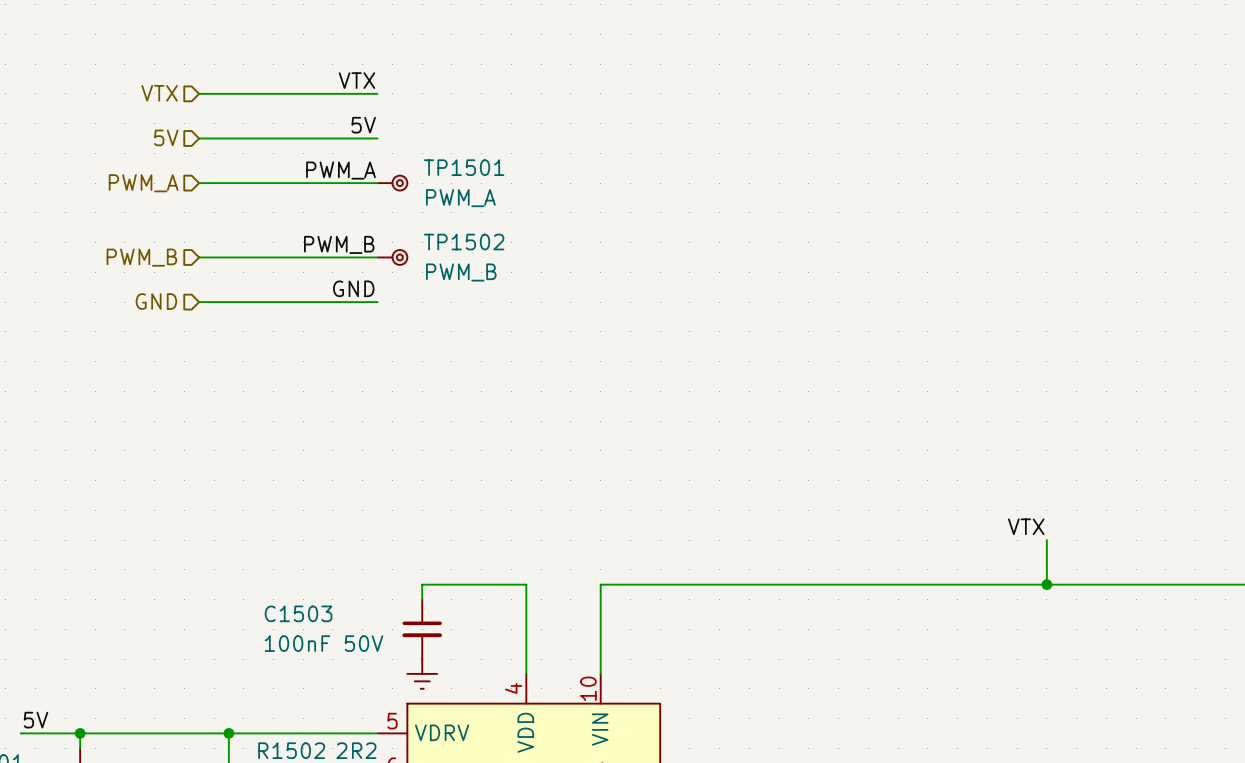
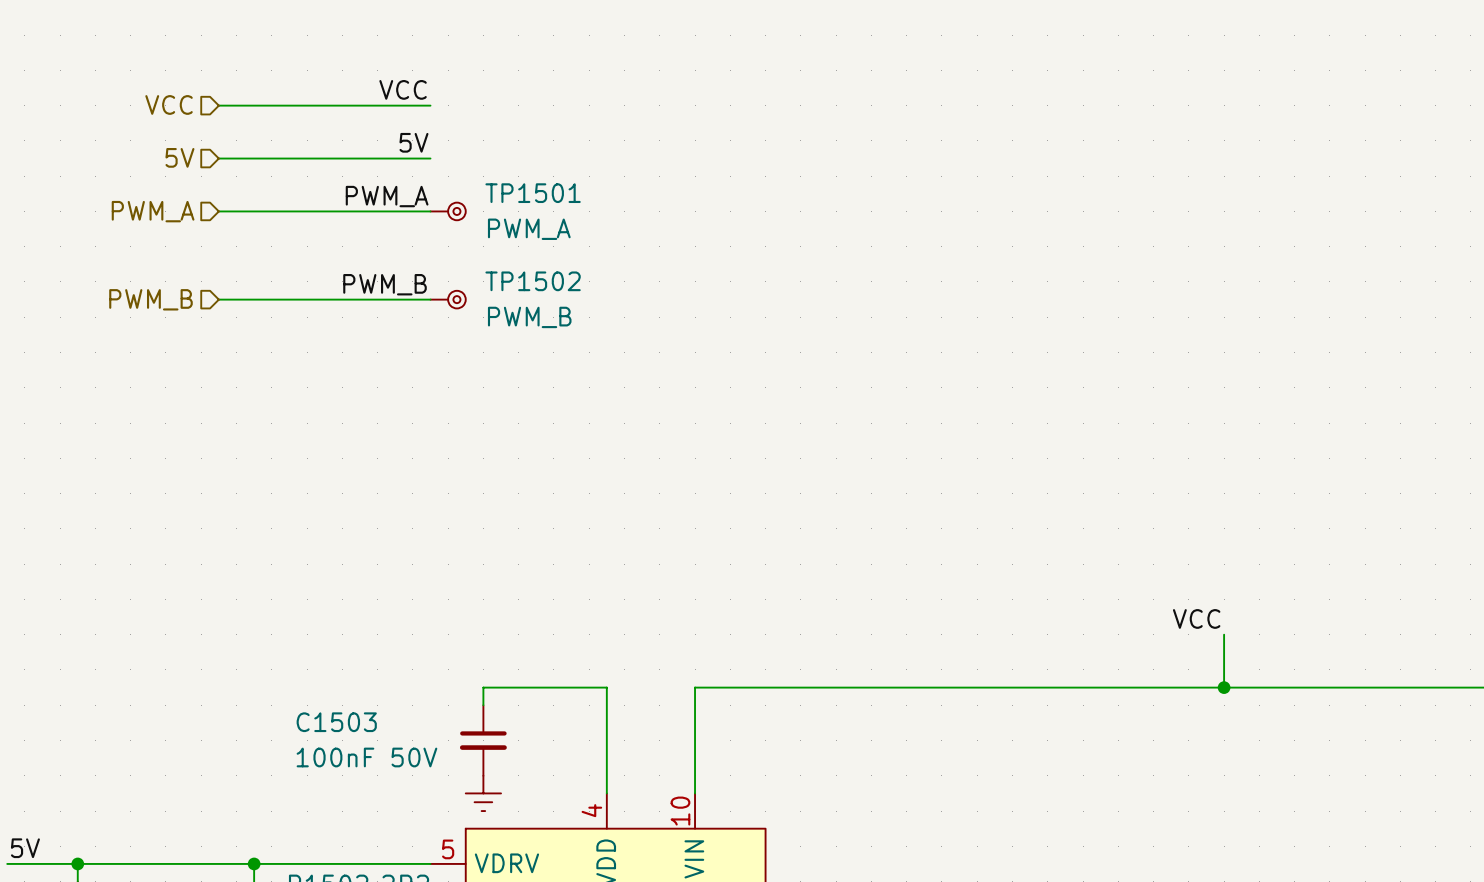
label: VTX (356, 80) -> VCC (403, 89)
hierarchical label: VTX (159, 93) -> VCC (169, 104)
label: GND (353, 288) -> none
hierarchical label: GND (156, 301) -> none
wire: (199, 302) (377, 302) -> none
label: VTX (1026, 526) -> VCC (1196, 618)

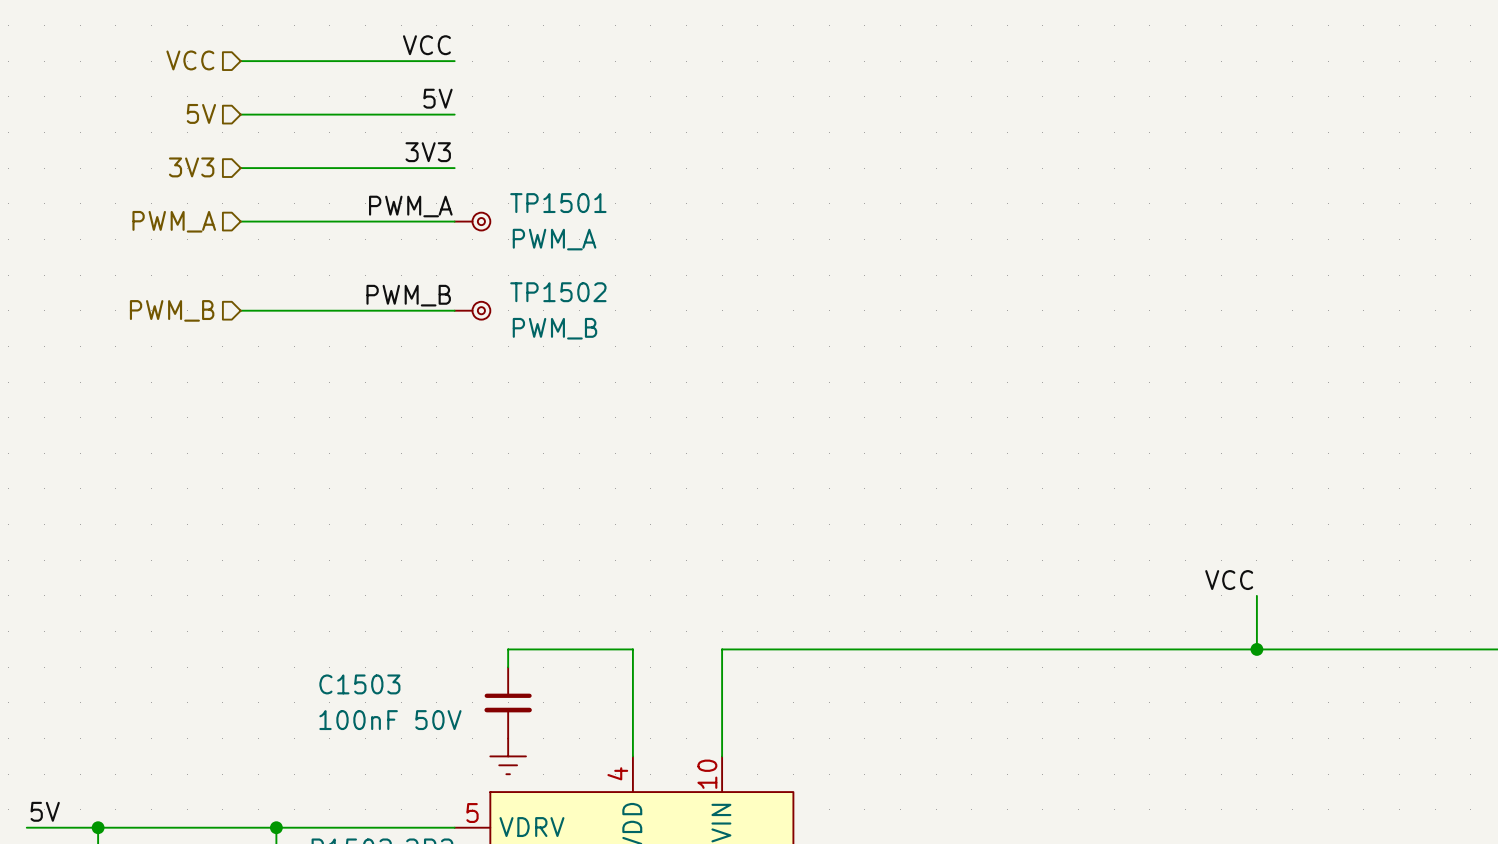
label: PWM_A (387, 196) -> 3V3 (428, 152)
hierarchical label: PWM_A (153, 211) -> 3V3 (191, 167)
TP1501 position: (448, 211) -> (472, 221)
label: none -> PWM_A (410, 206)
hierarchical label: none -> PWM_A (174, 221)
label position: PWM_B (385, 284) -> PWM_B (408, 295)
hierarchical label position: PWM_B (150, 299) -> PWM_B (172, 310)
wire: (218, 299) (430, 299) -> (240, 221) (454, 221)
TP1502 position: (448, 299) -> (472, 310)
wire: none -> (240, 310) (454, 310)

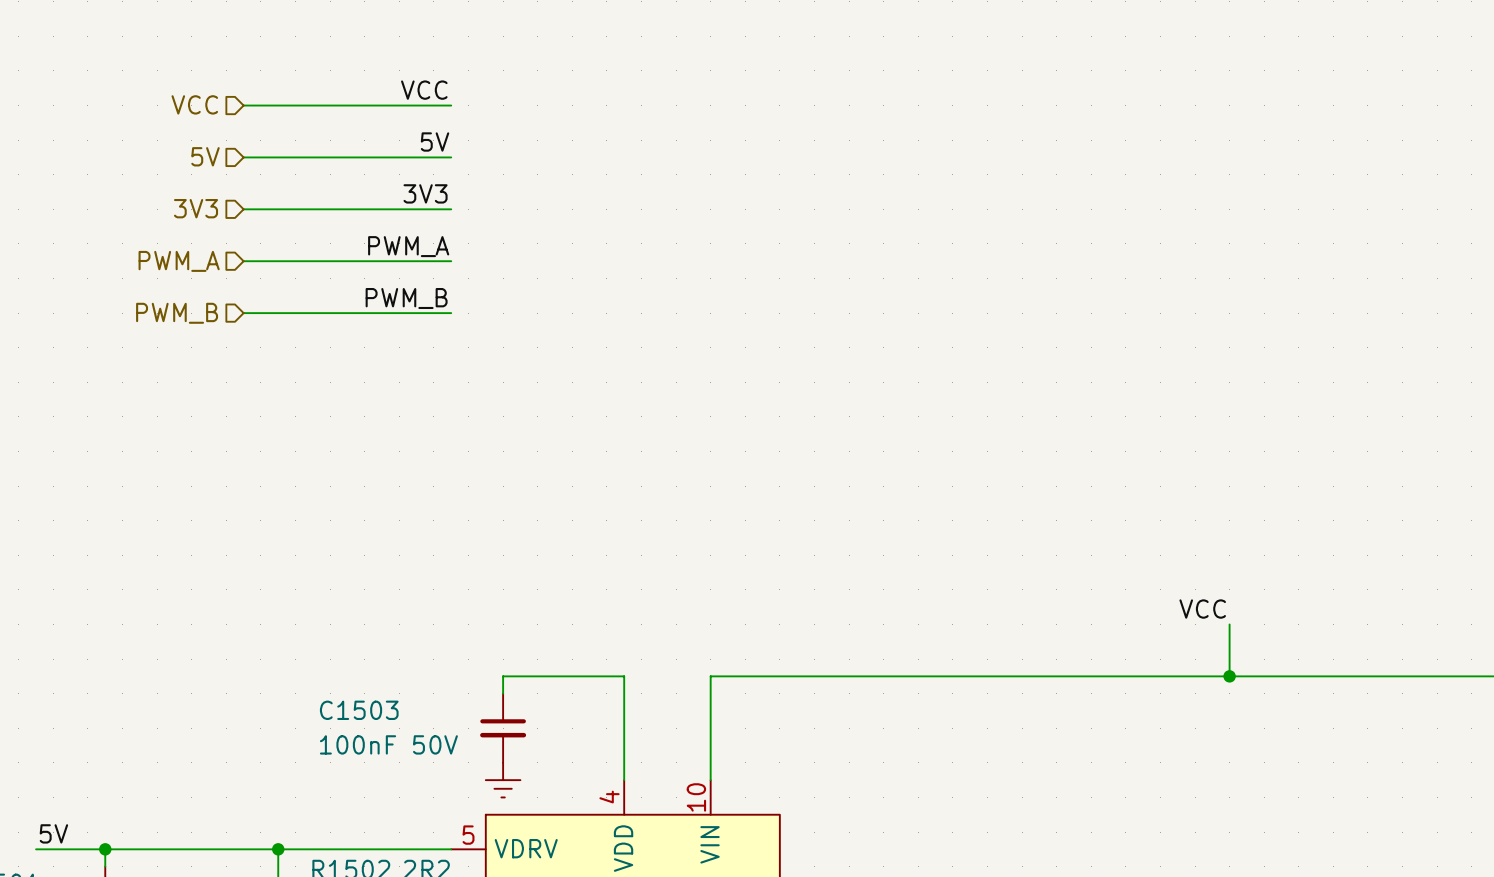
TP1501: PWM_A (472, 221) -> none
label position: PWM_B (408, 295) -> PWM_B (406, 298)
hierarchical label position: PWM_B (172, 310) -> PWM_B (177, 313)
wire: (240, 310) (454, 310) -> (243, 313) (451, 313)
TP1502: PWM_B (472, 310) -> none

